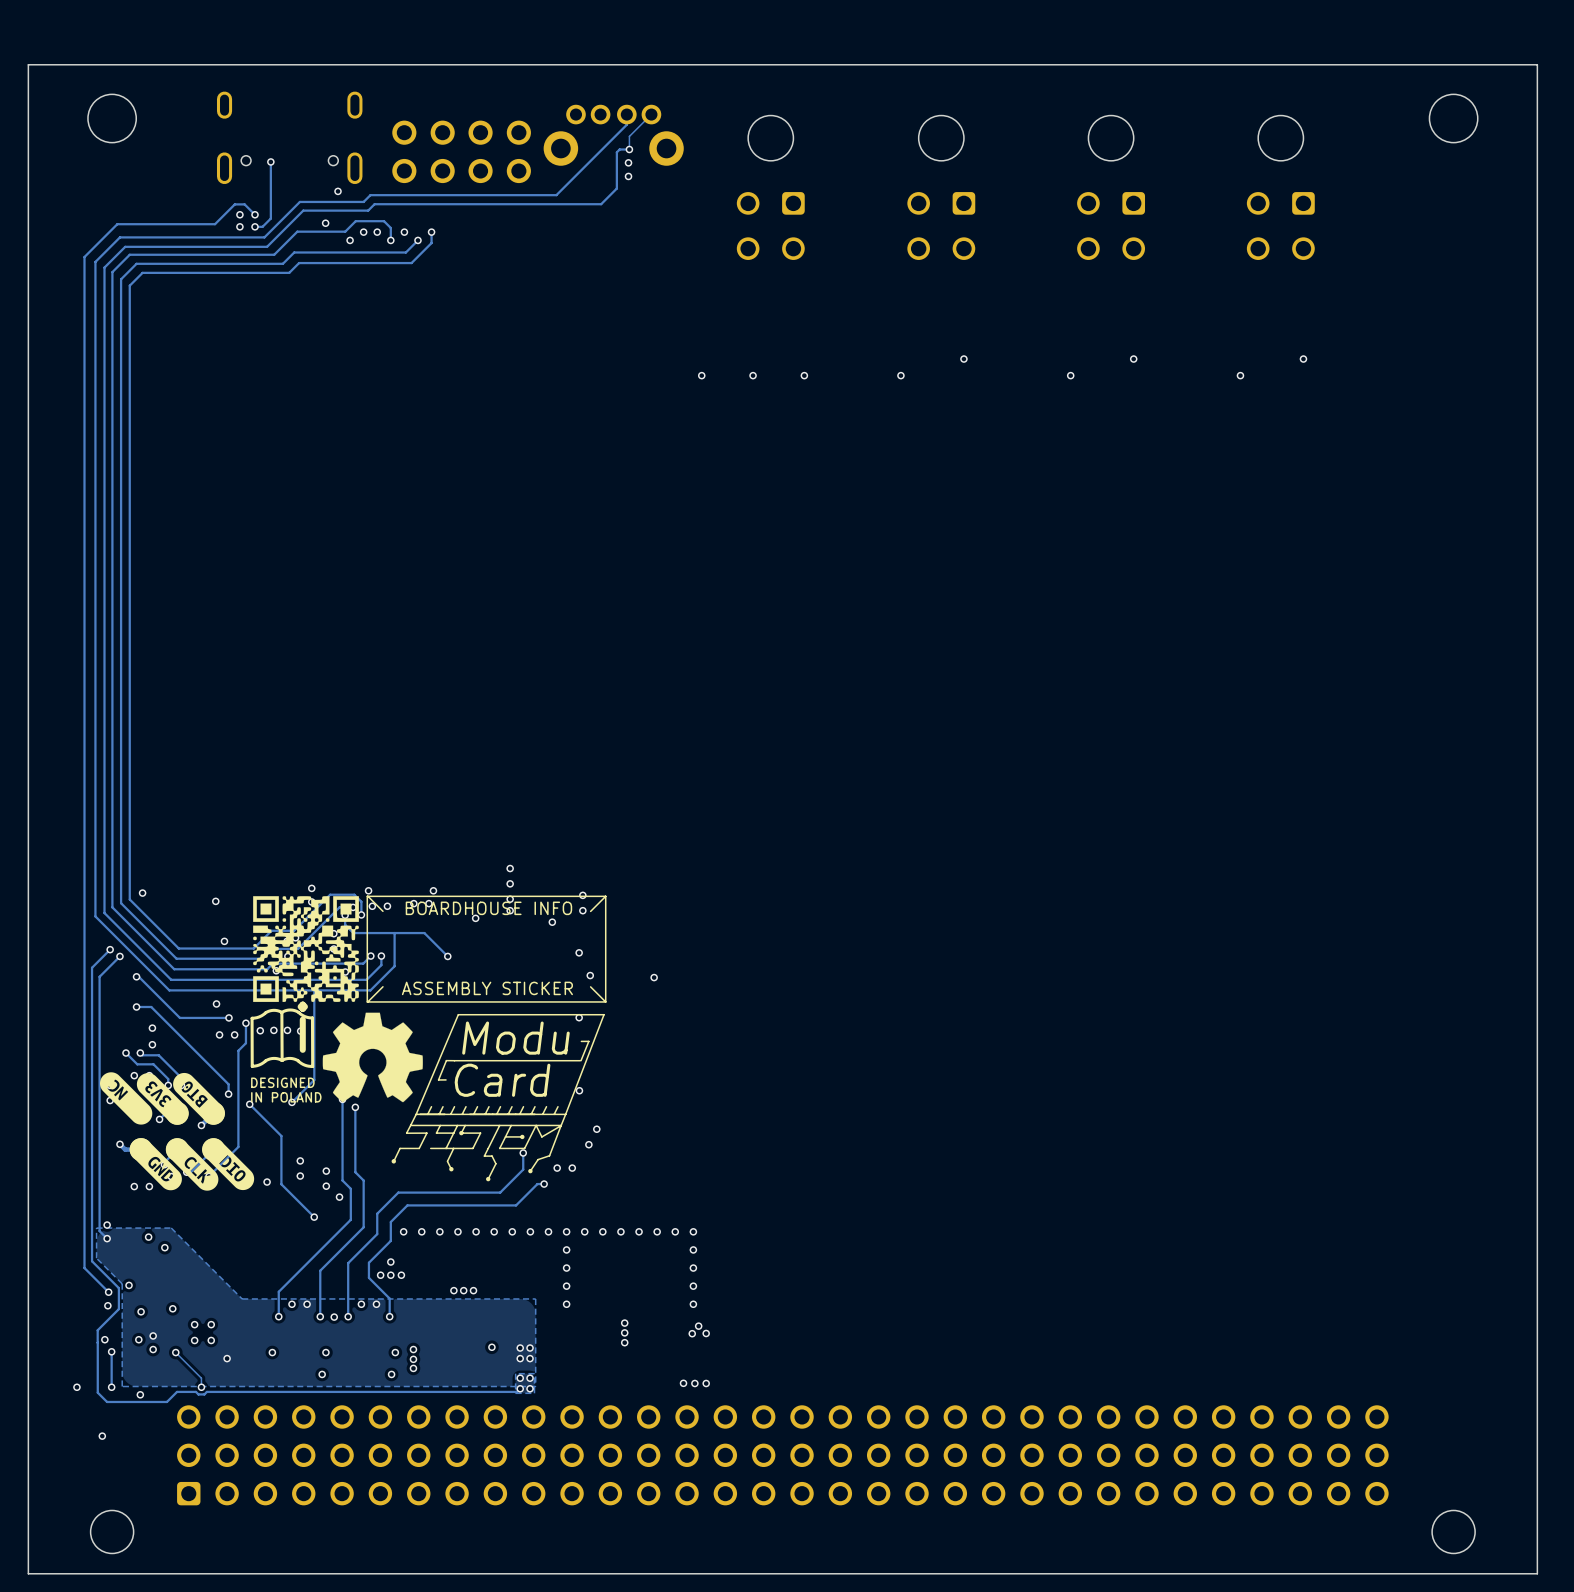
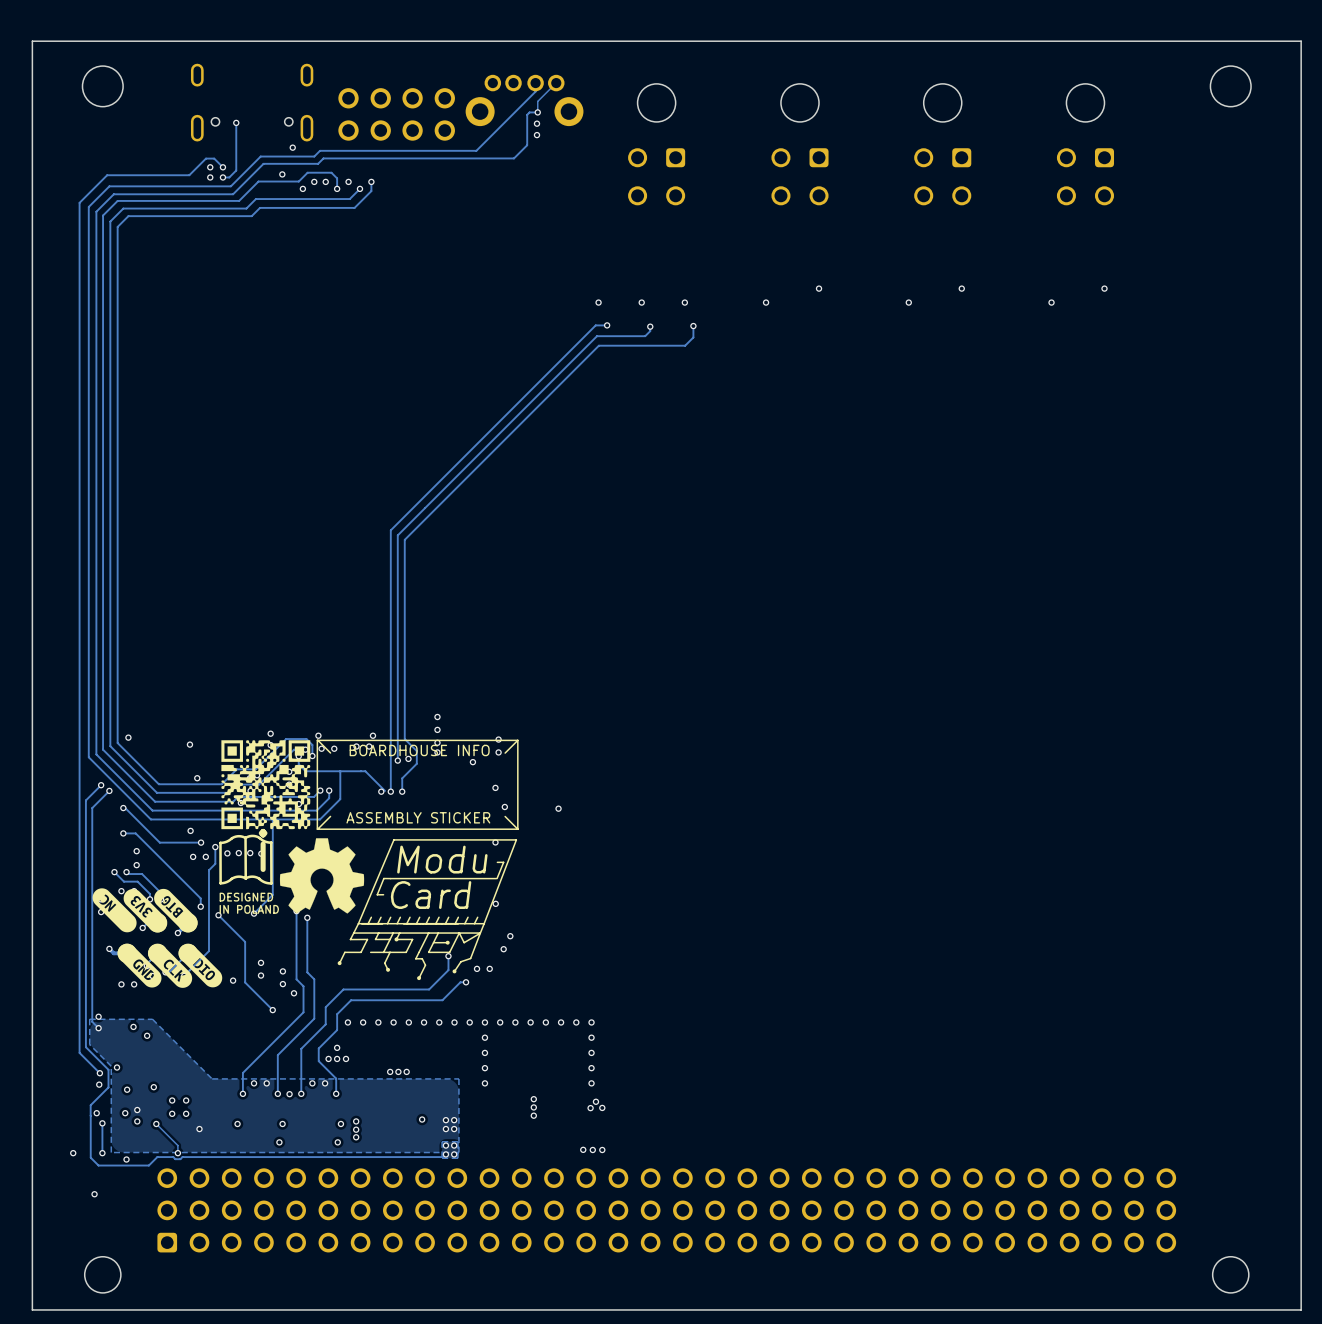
track: none -> (607, 325) (595, 325) (390, 530) (390, 791)
via: none -> (607, 325)
track: none -> (693, 326) (693, 337) (685, 345) (598, 345) (404, 539) (404, 739) (416, 751) (416, 763) (402, 778) (402, 791)
via: none -> (693, 326)
track: none -> (650, 326) (650, 331) (645, 336) (596, 336) (397, 535) (397, 760)
via: none -> (650, 326)
via: none -> (397, 760)
via: (447, 956) -> none
via: none -> (381, 791)
via: none -> (390, 791)
via: none -> (402, 791)

